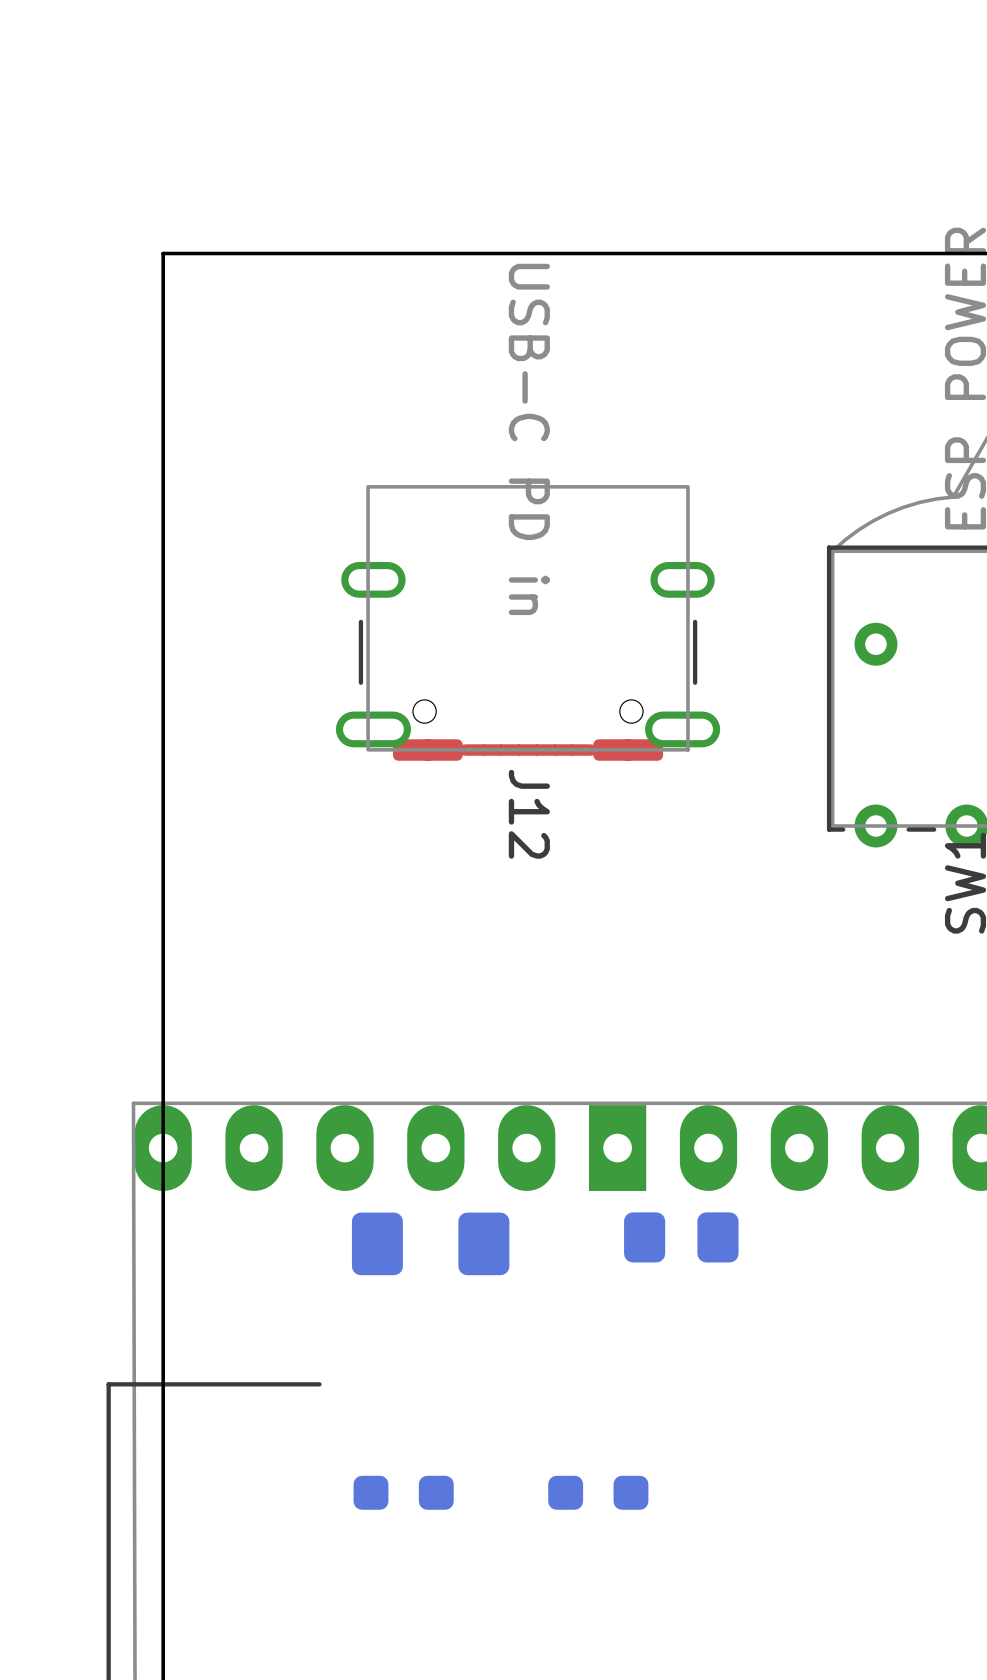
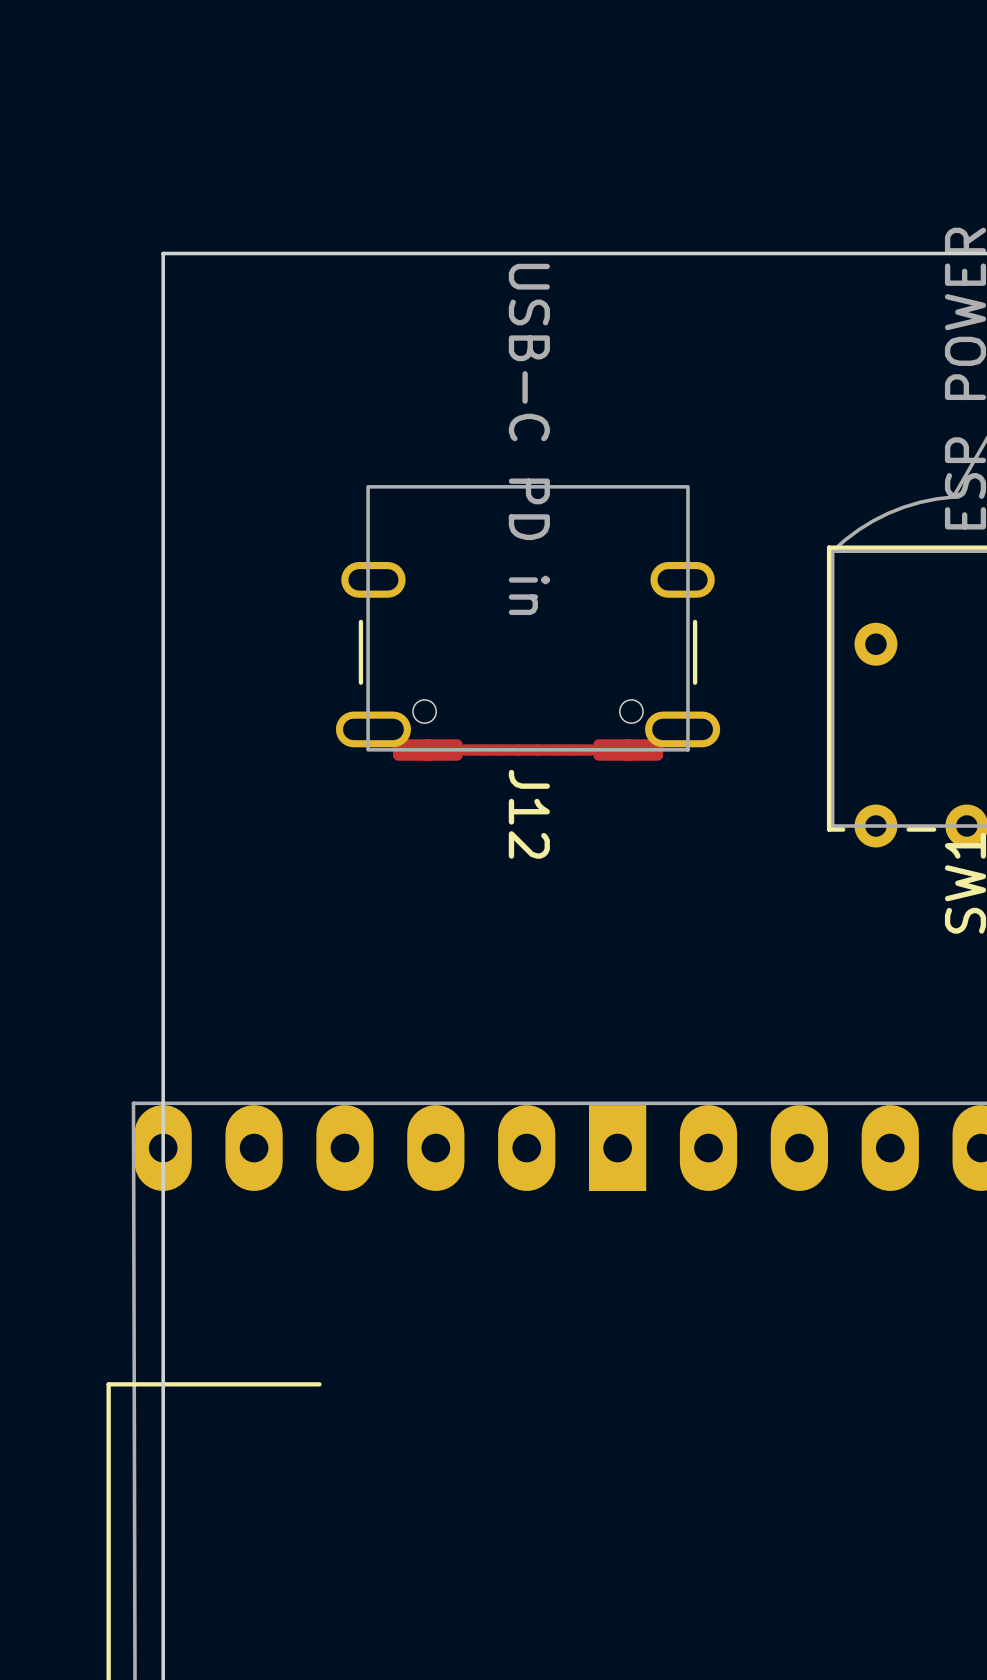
part: (681, 1237) -> none
part: (430, 1243) -> none
part: (403, 1492) -> none
part: (598, 1492) -> none

